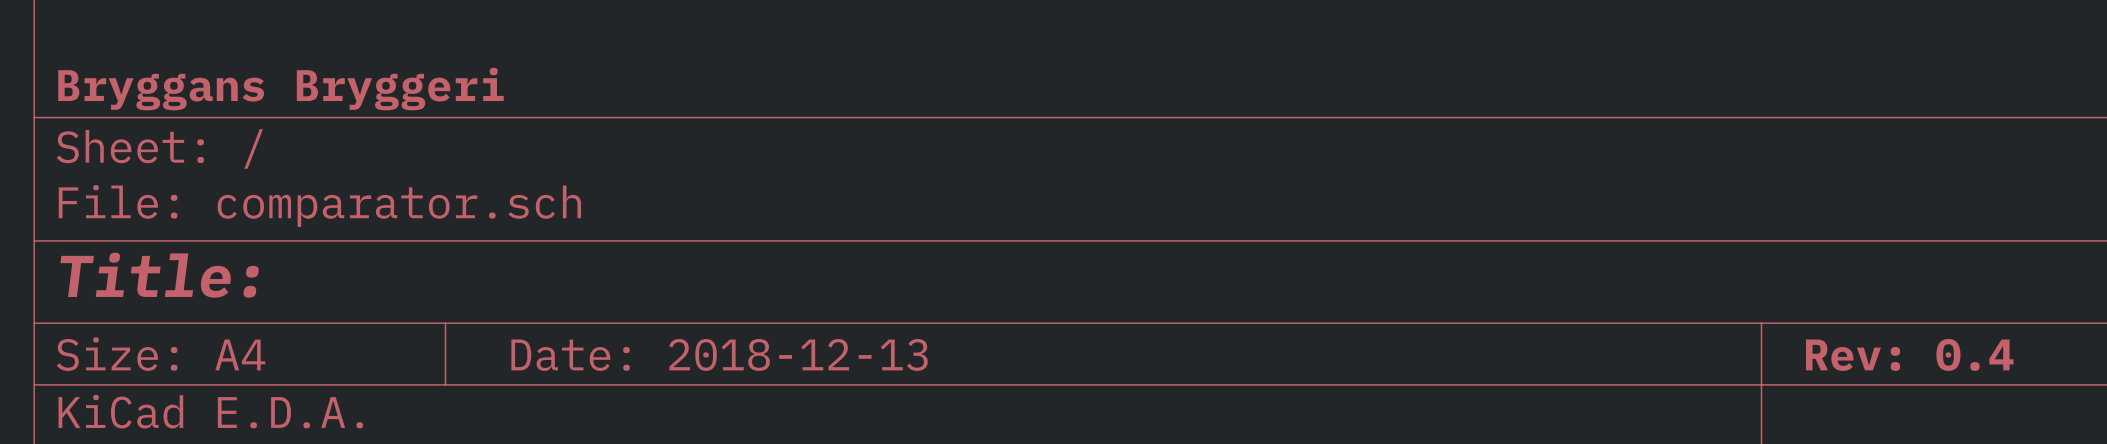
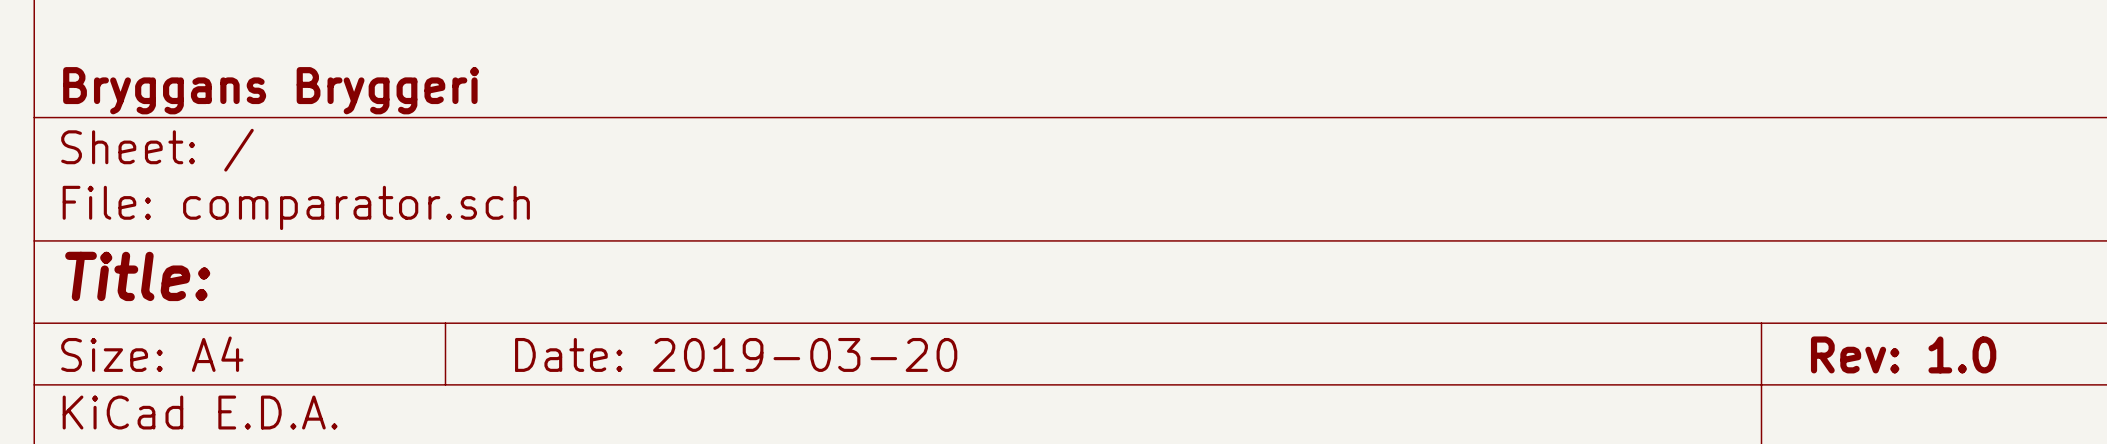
title block: Date: 2018-12-13 (719, 354) -> Date: 2019-03-20 (736, 354)
title block: Rev: 0.4 (1909, 354) -> Rev: 1.0 (1903, 354)

